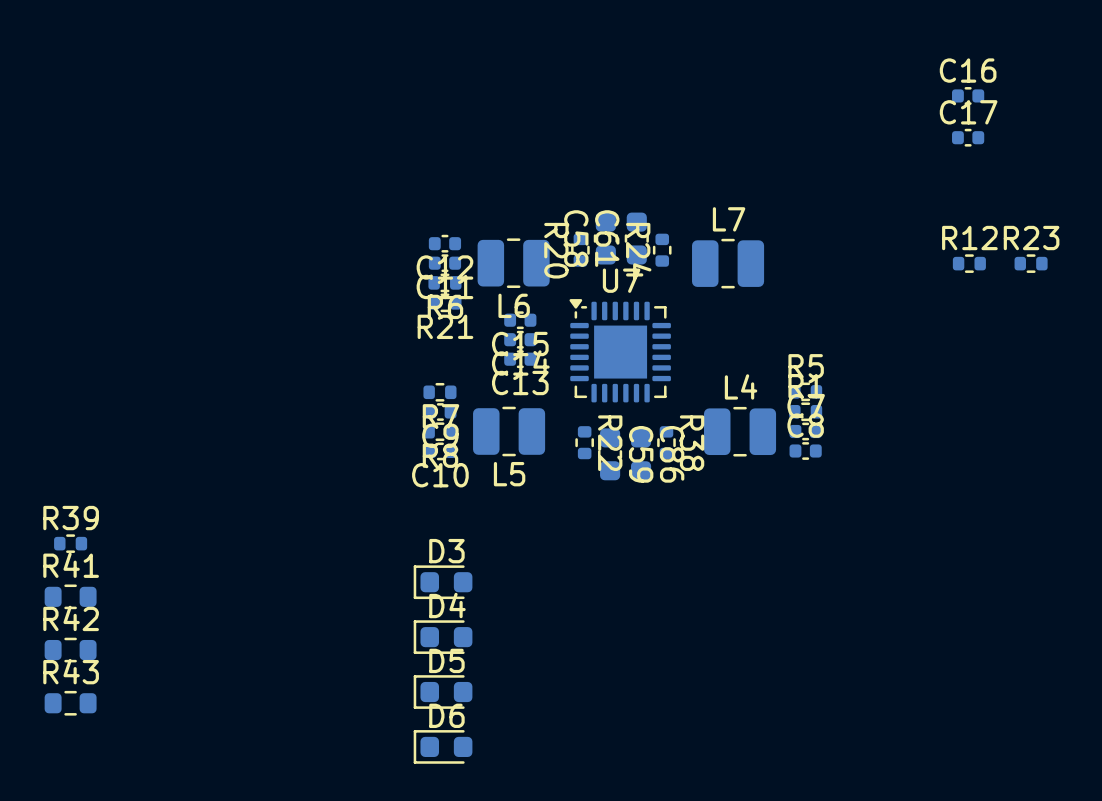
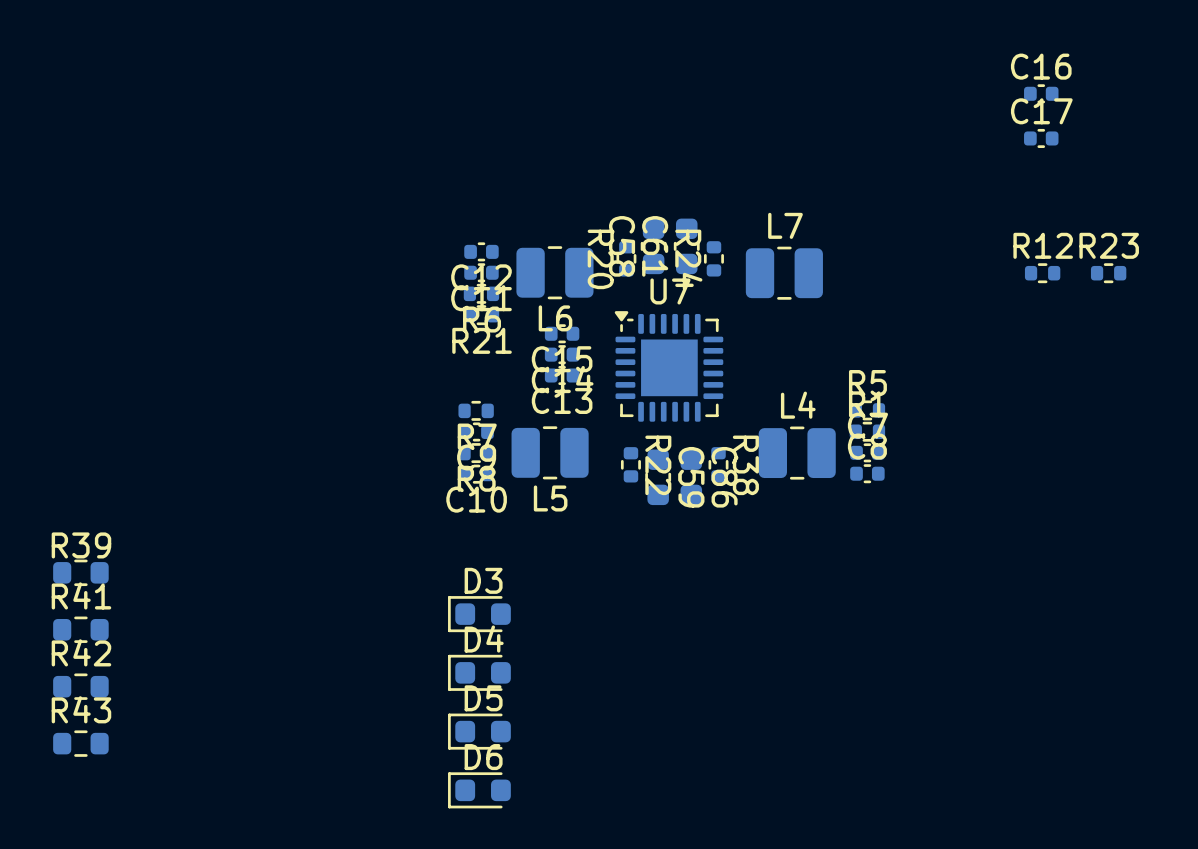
R39 footprint: [54, 534, 88, 553] -> [53, 559, 109, 587]

